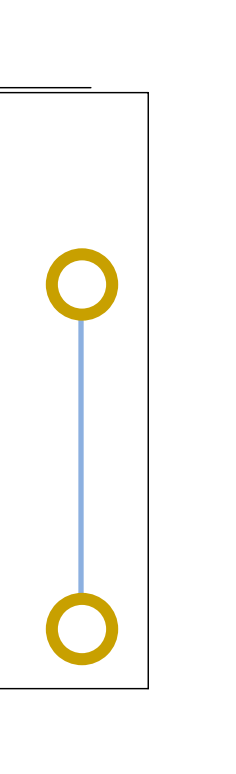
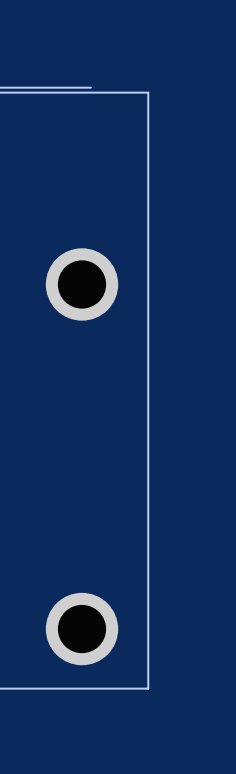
track: (82, 284) (82, 629) -> none

